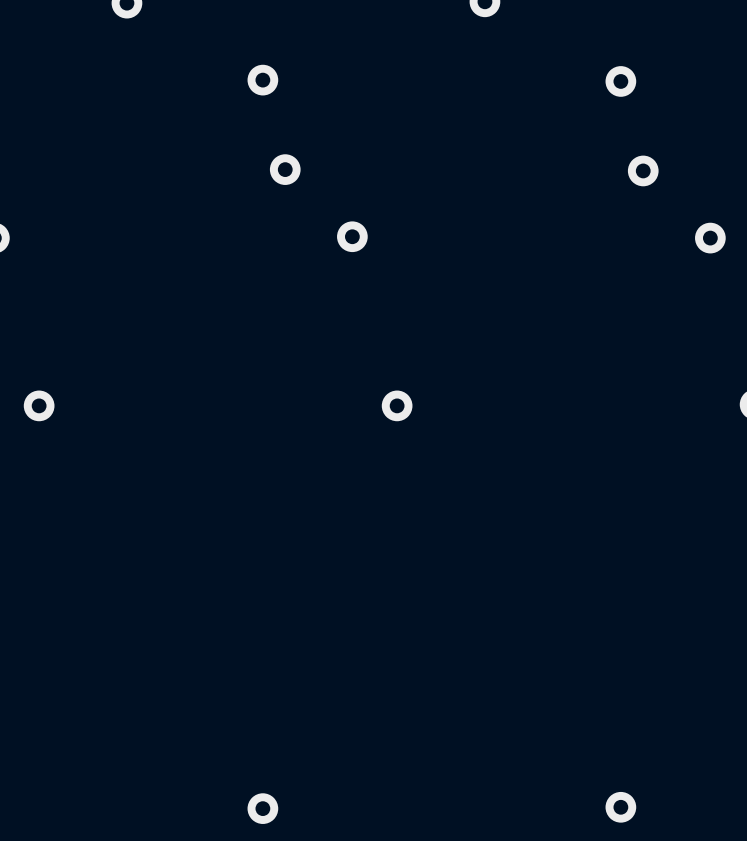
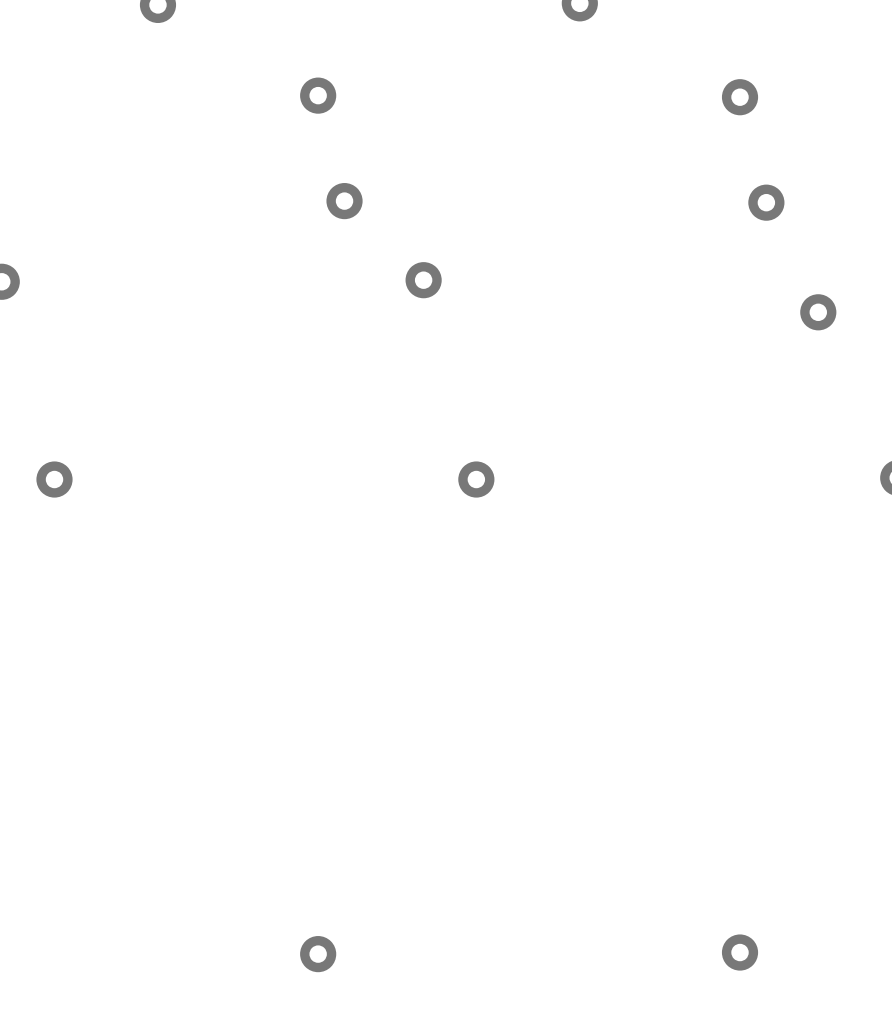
via position: (710, 238) -> (818, 312)

